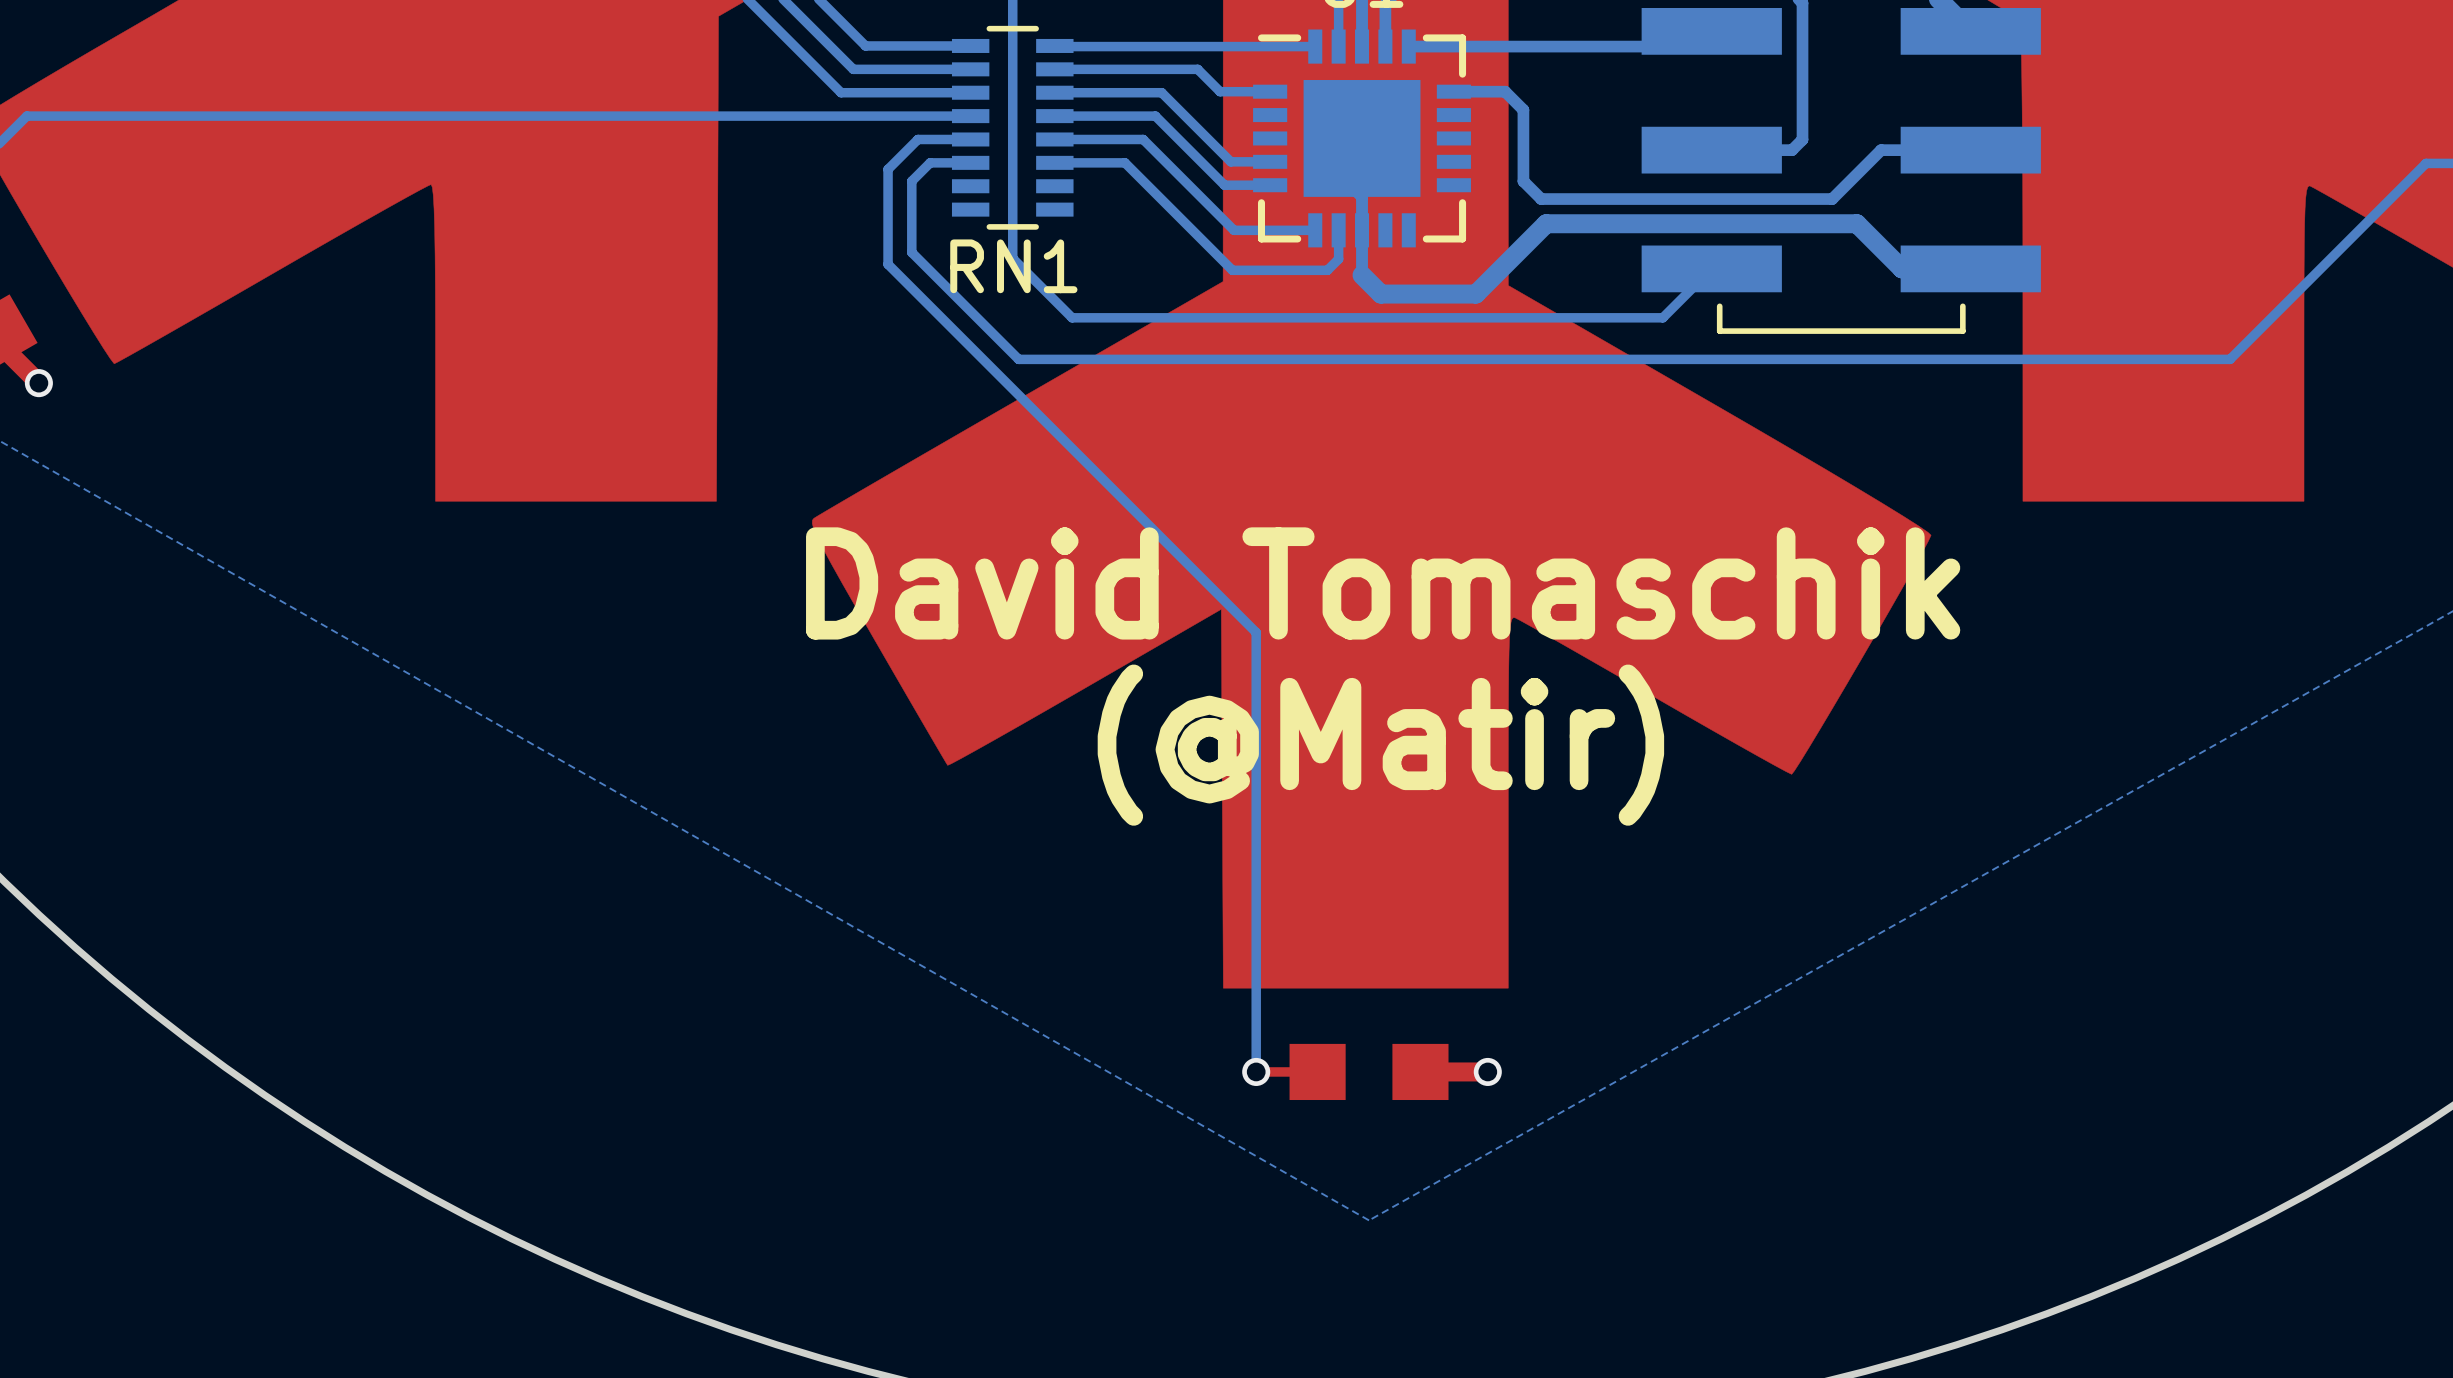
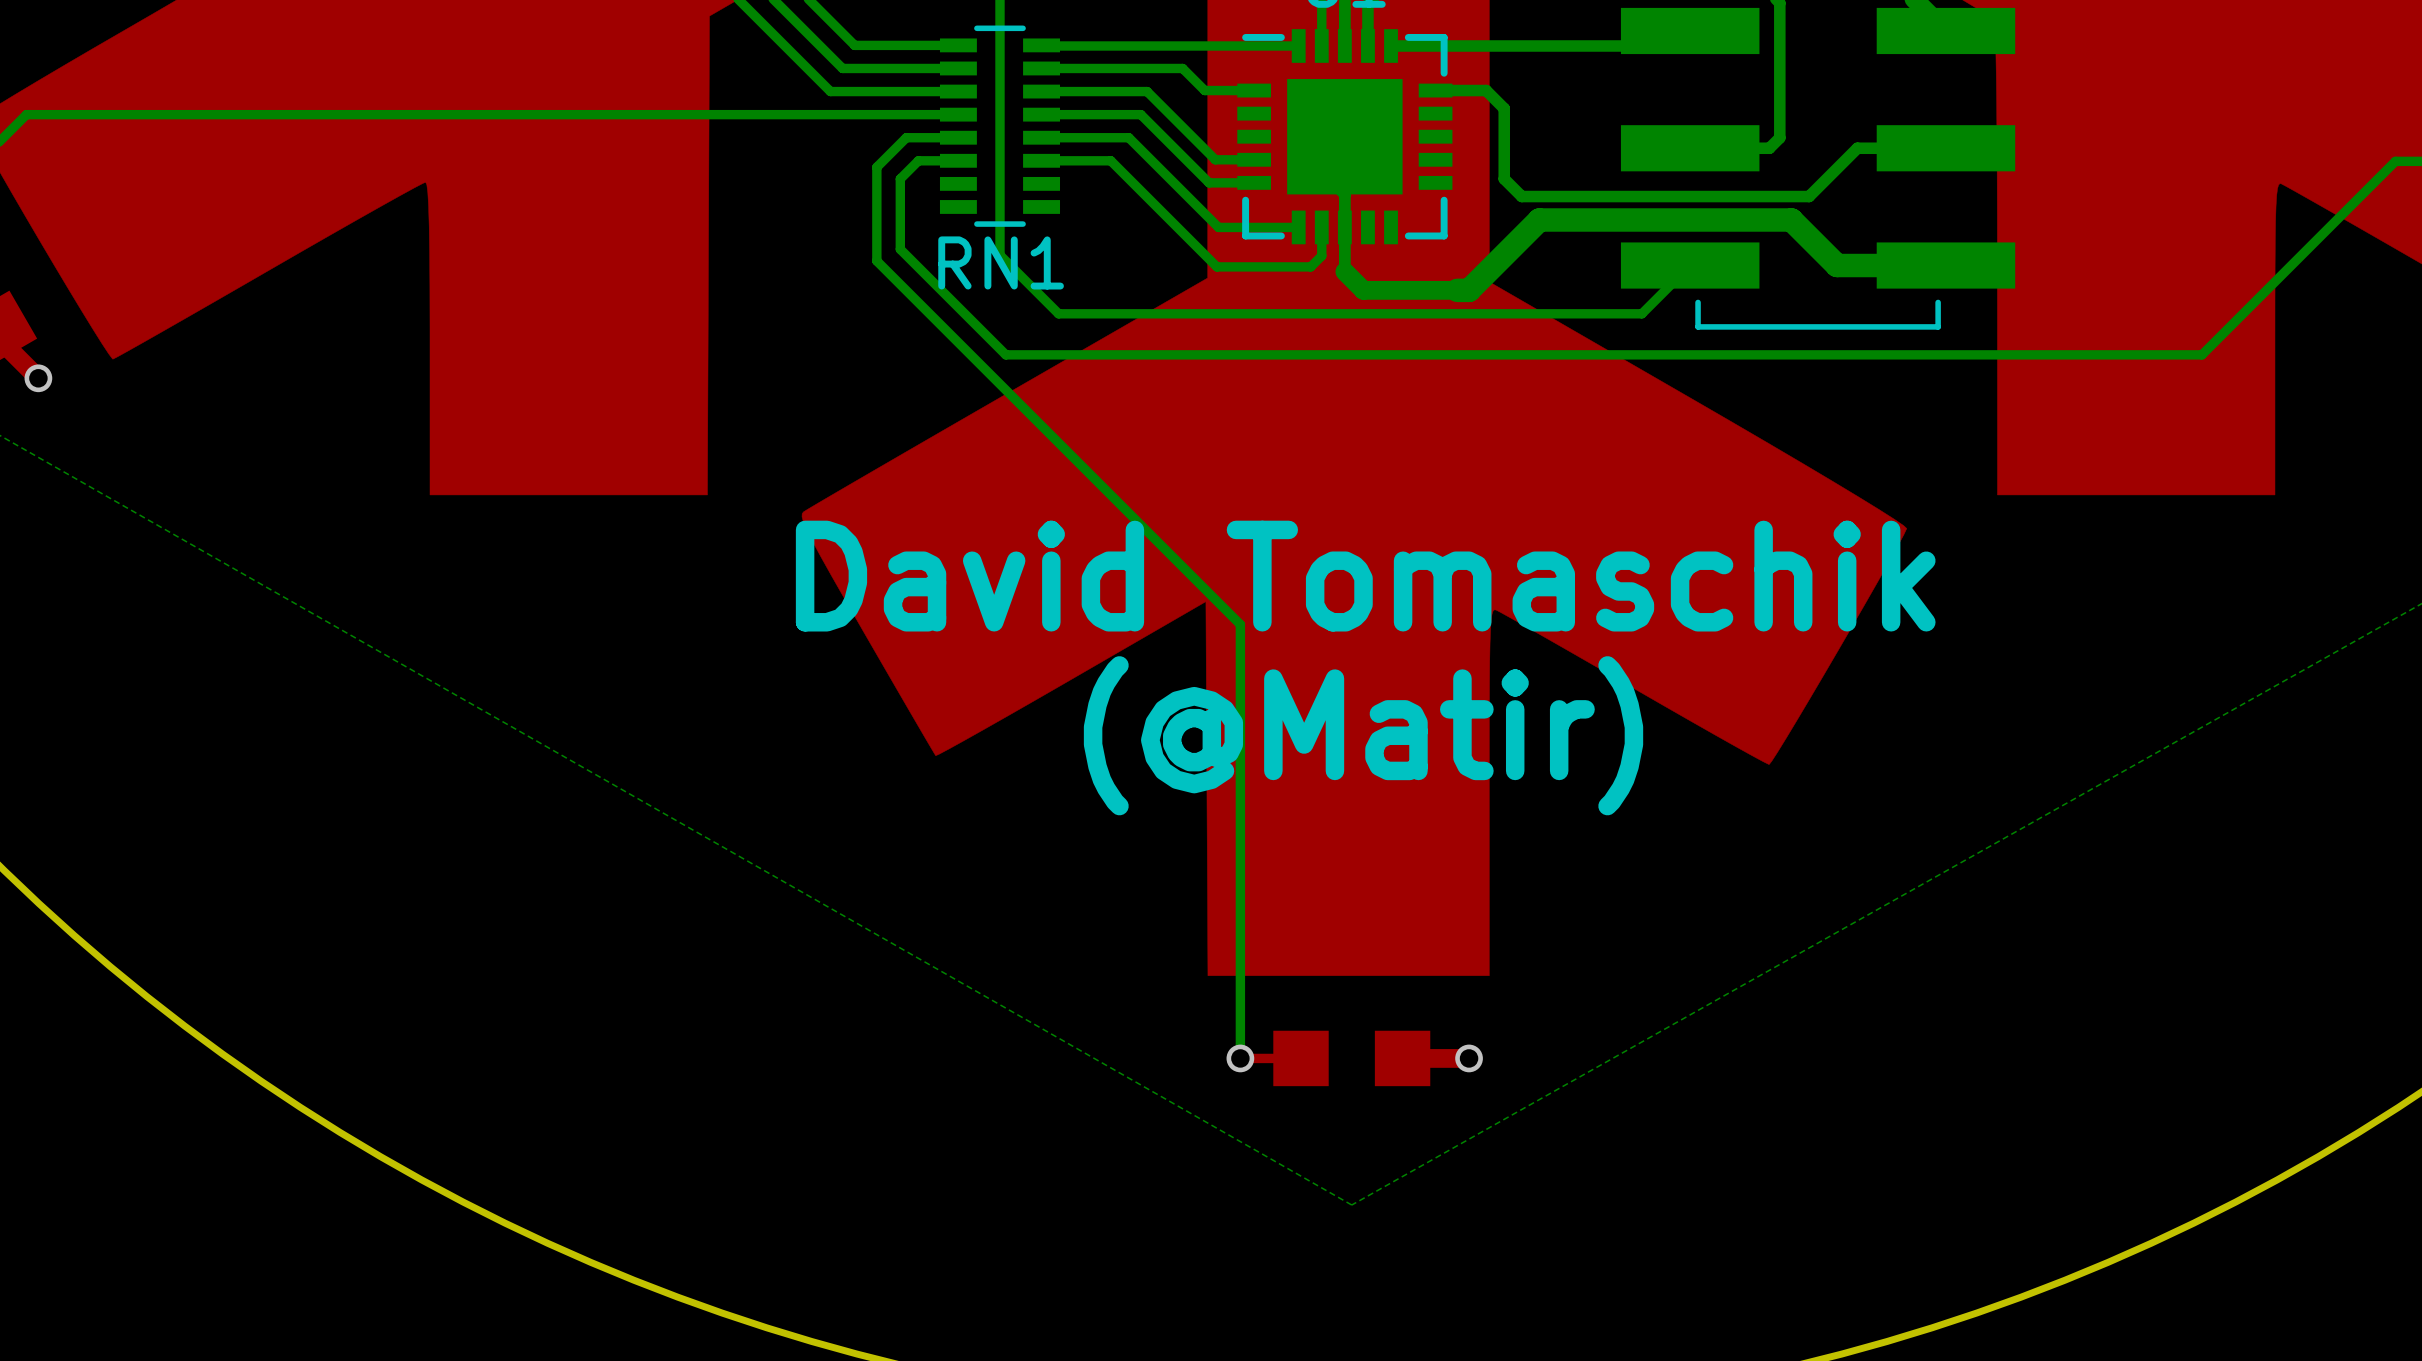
bottom track: (1902, 268) (1856, 223) (1546, 223) (1475, 294) -> (1878, 265) (1837, 265) (1791, 219) (1539, 219) (1469, 290) (1457, 290)

